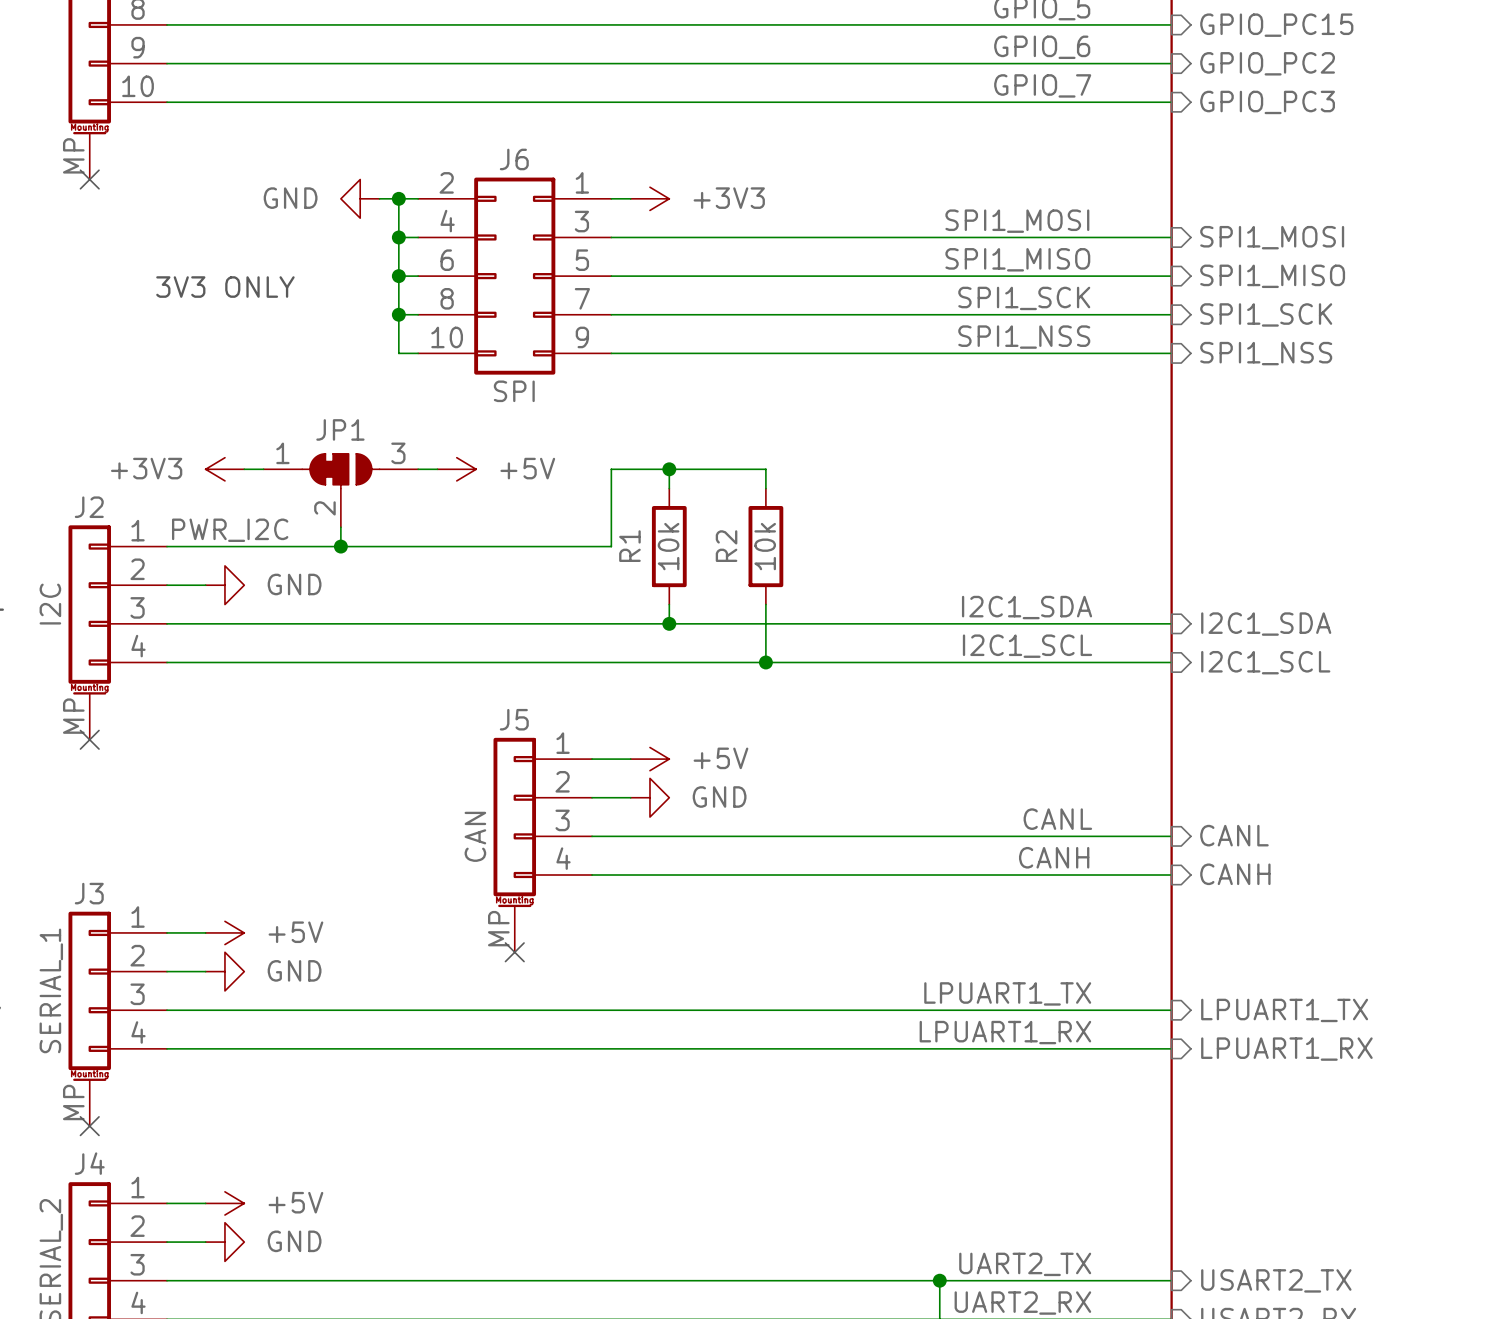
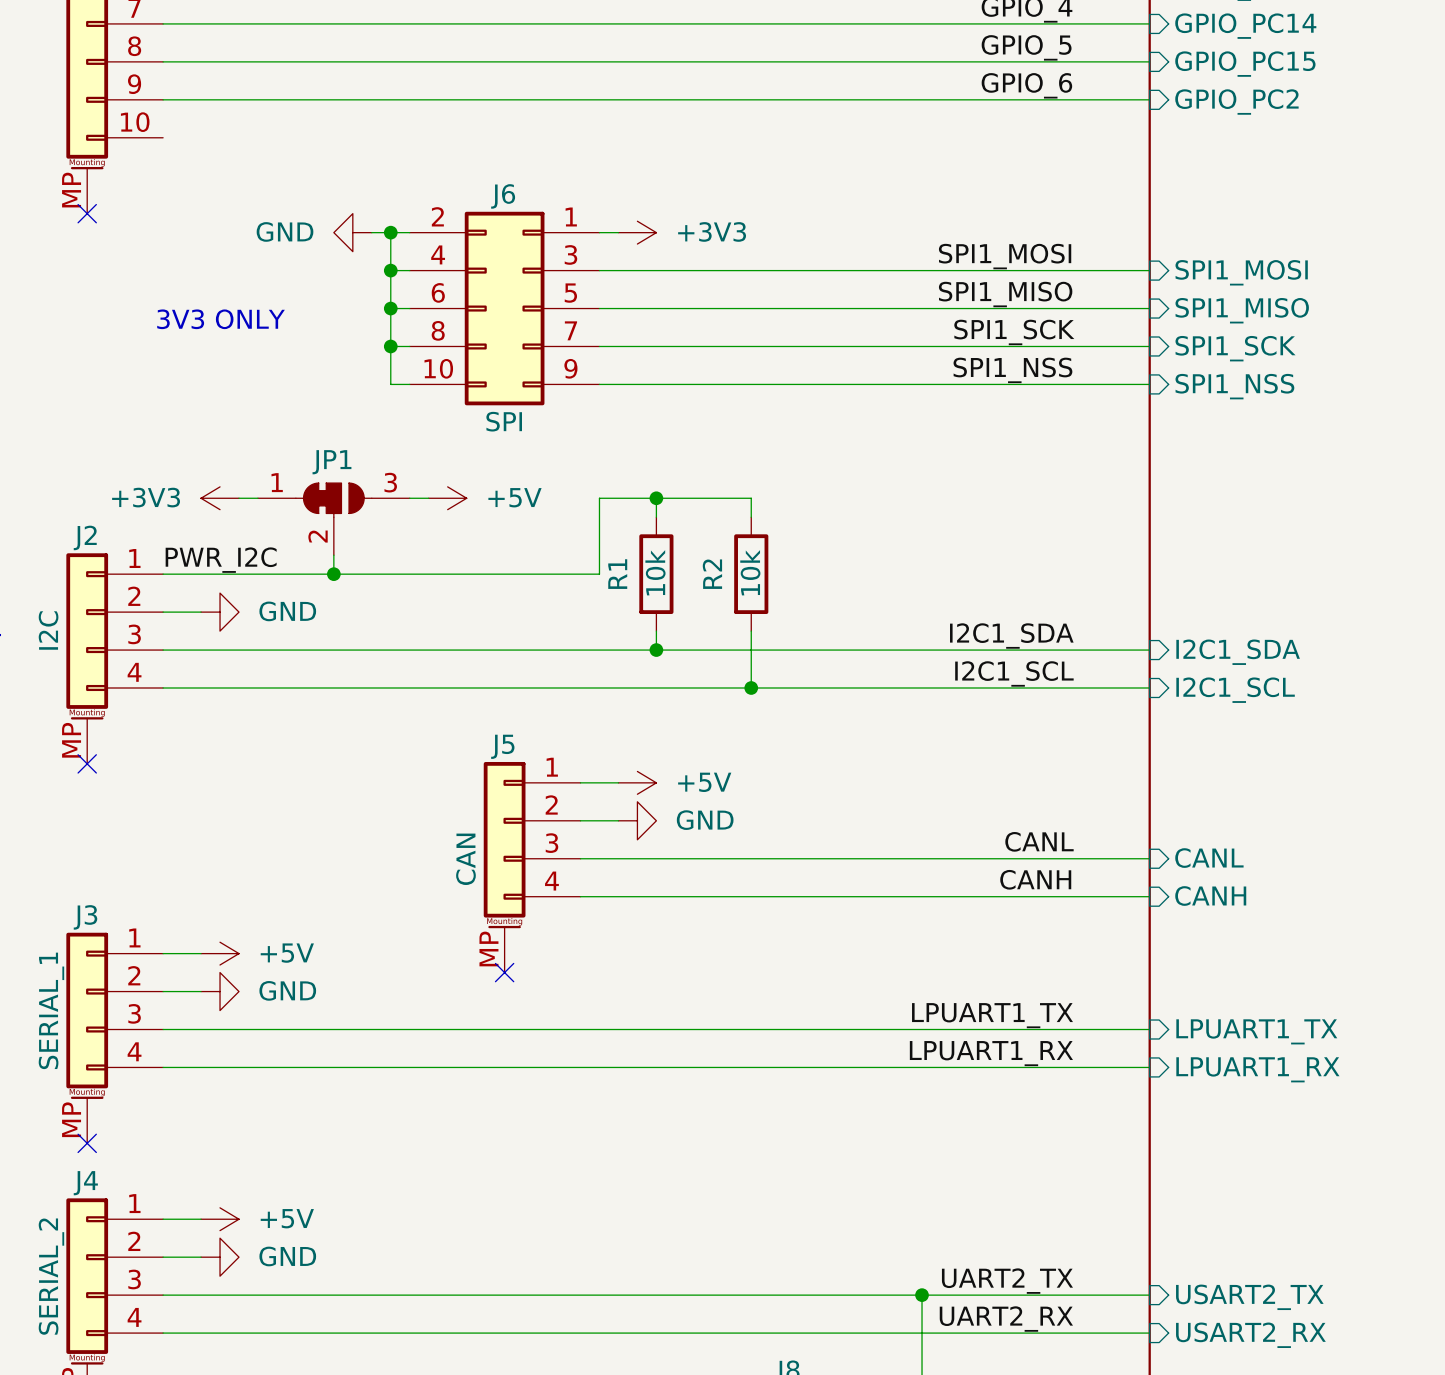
label: GPIO_7 (1042, 85) -> none
wire: (167, 102) (1171, 102) -> none
sheet pin: GPIO_PC3 (1267, 102) -> none

